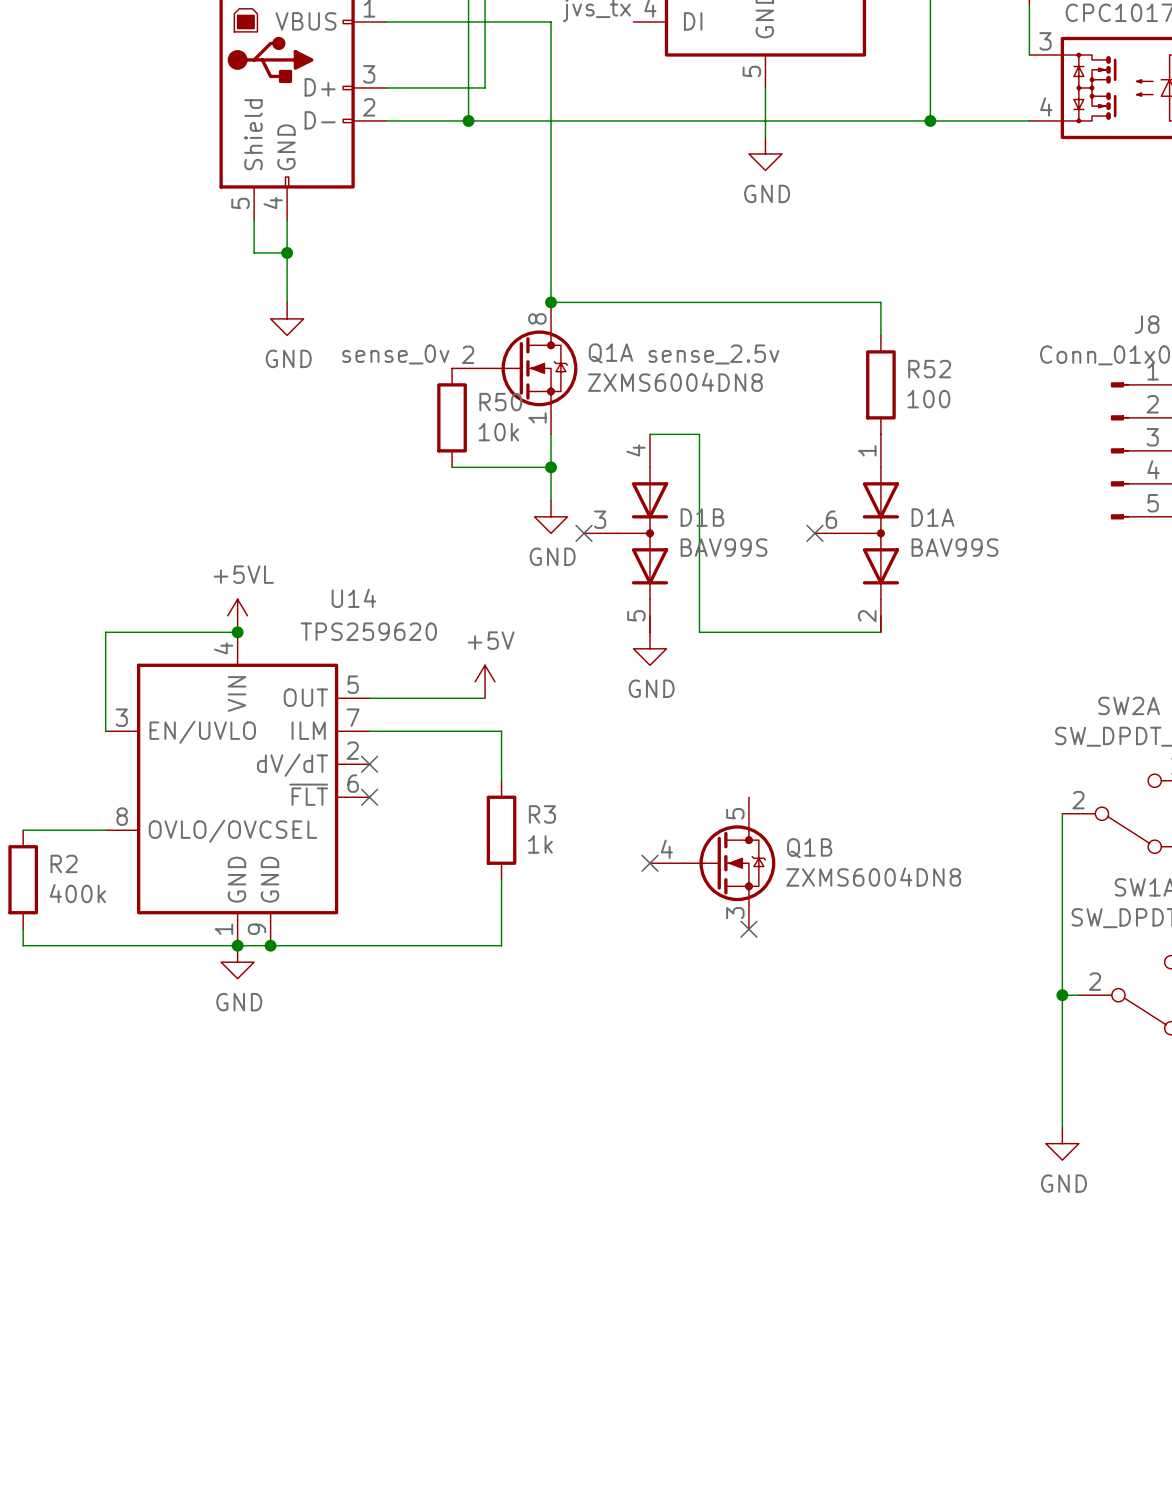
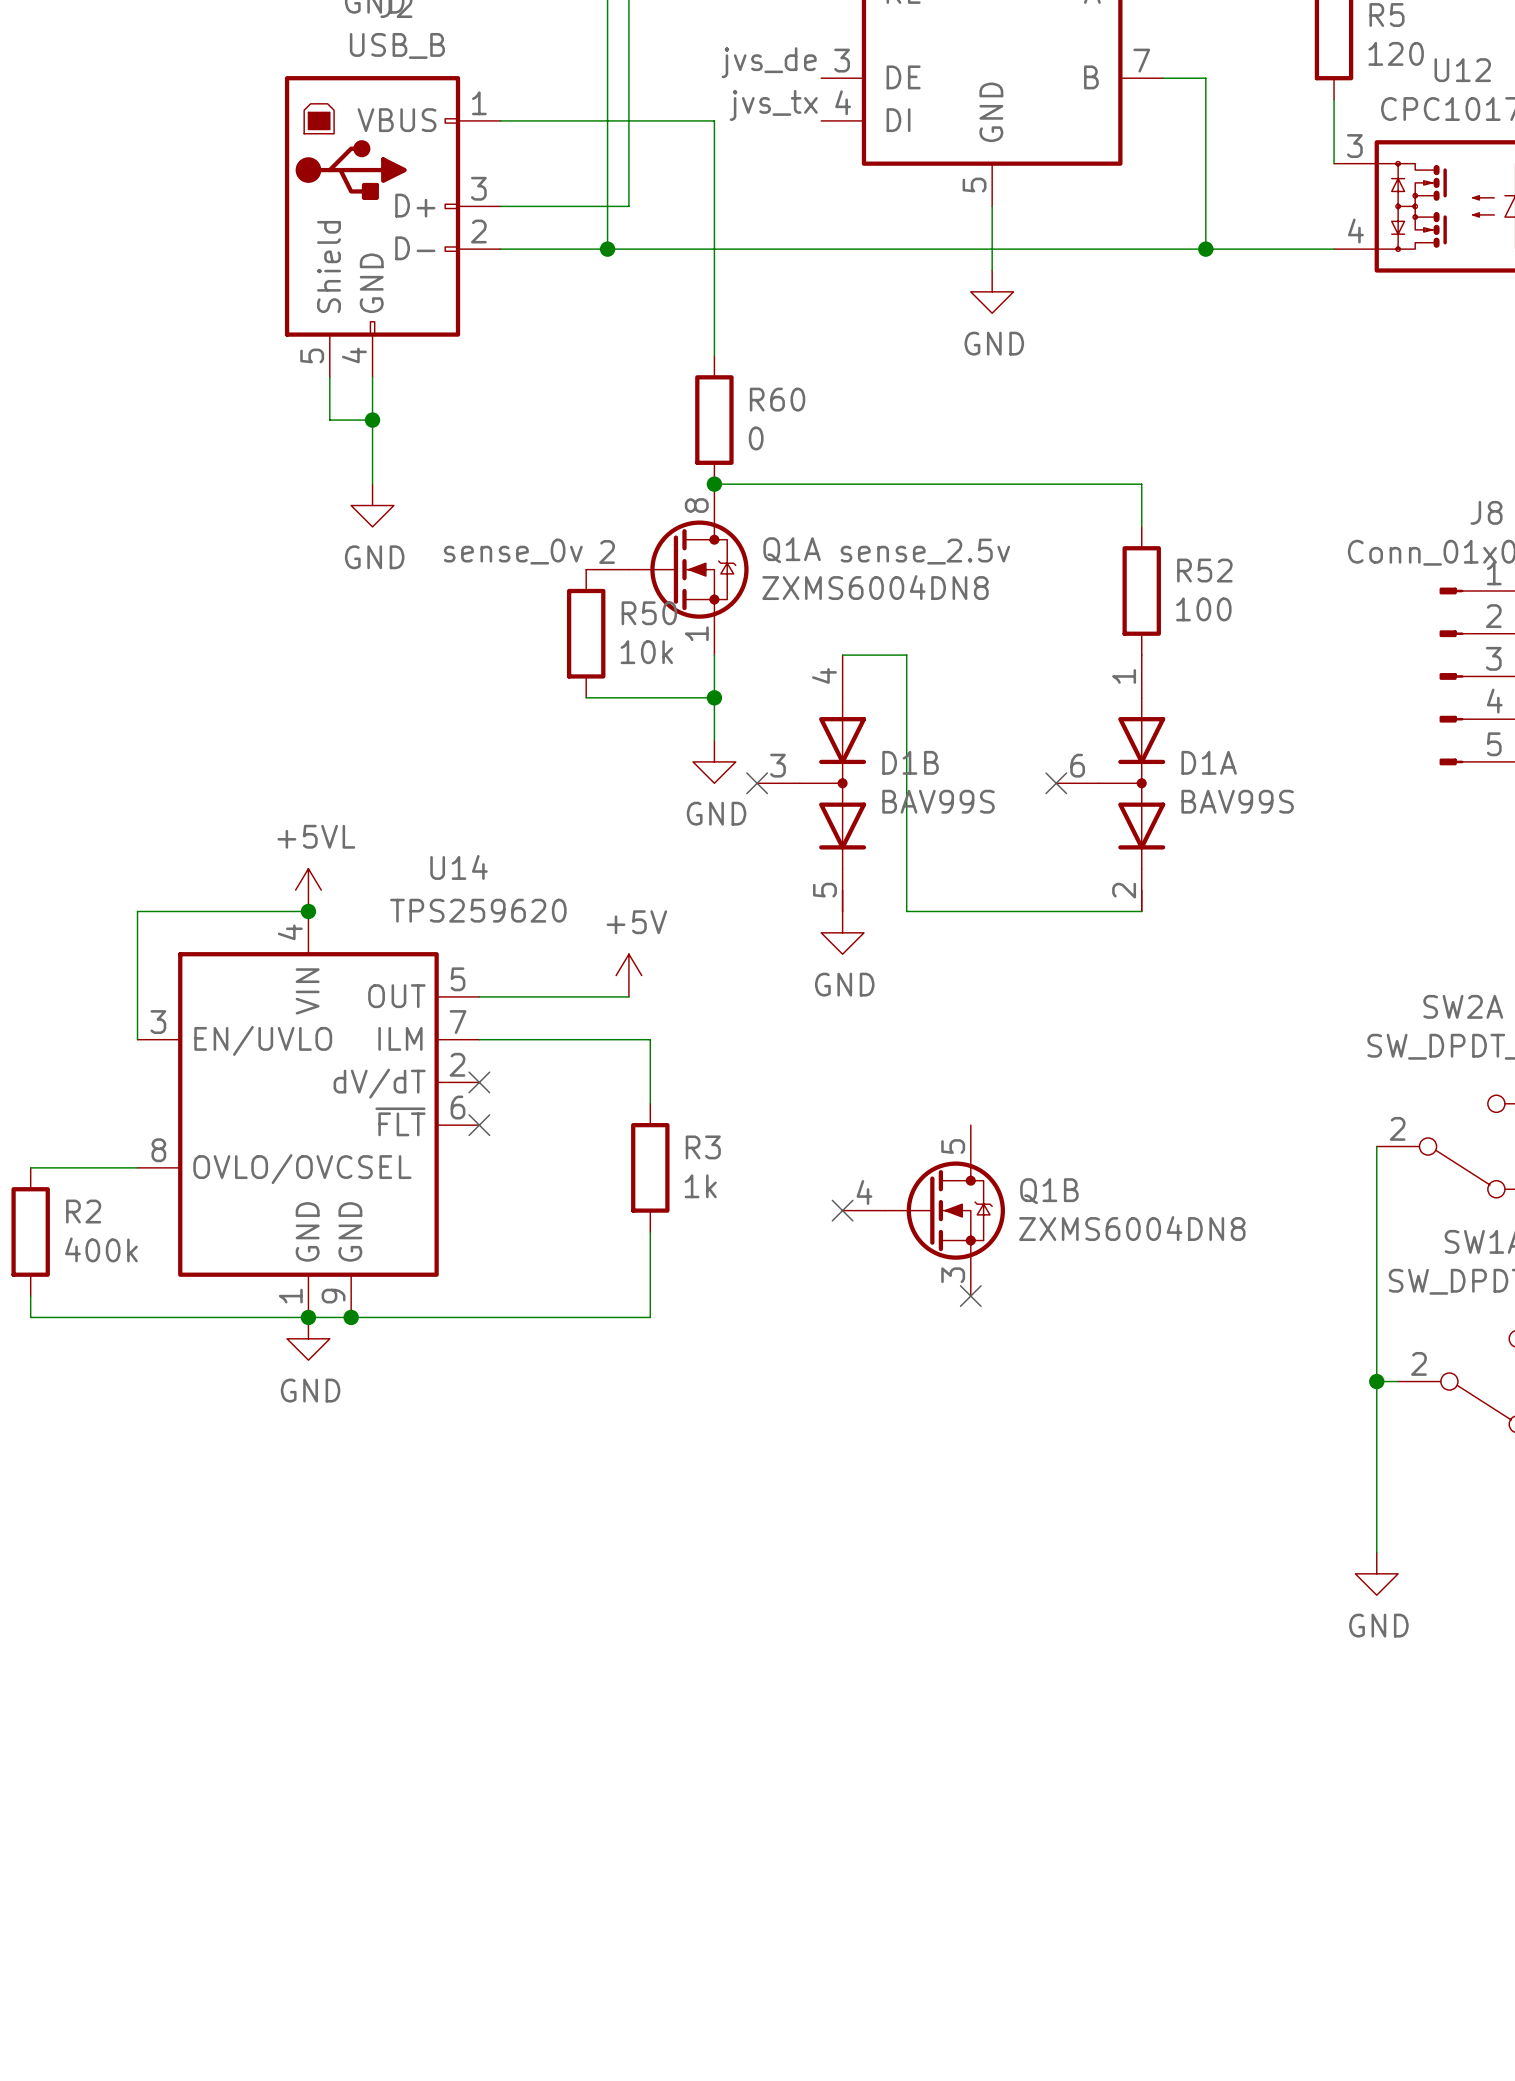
wire: (551, 203) (551, 302) -> none
R60: none -> 0 (714, 420)

